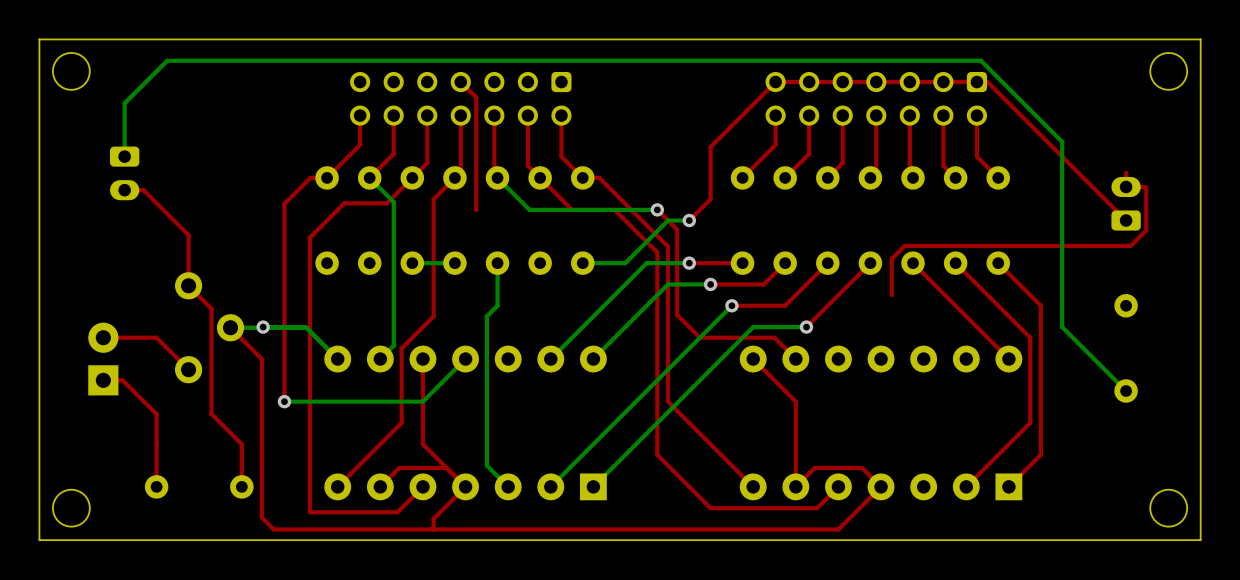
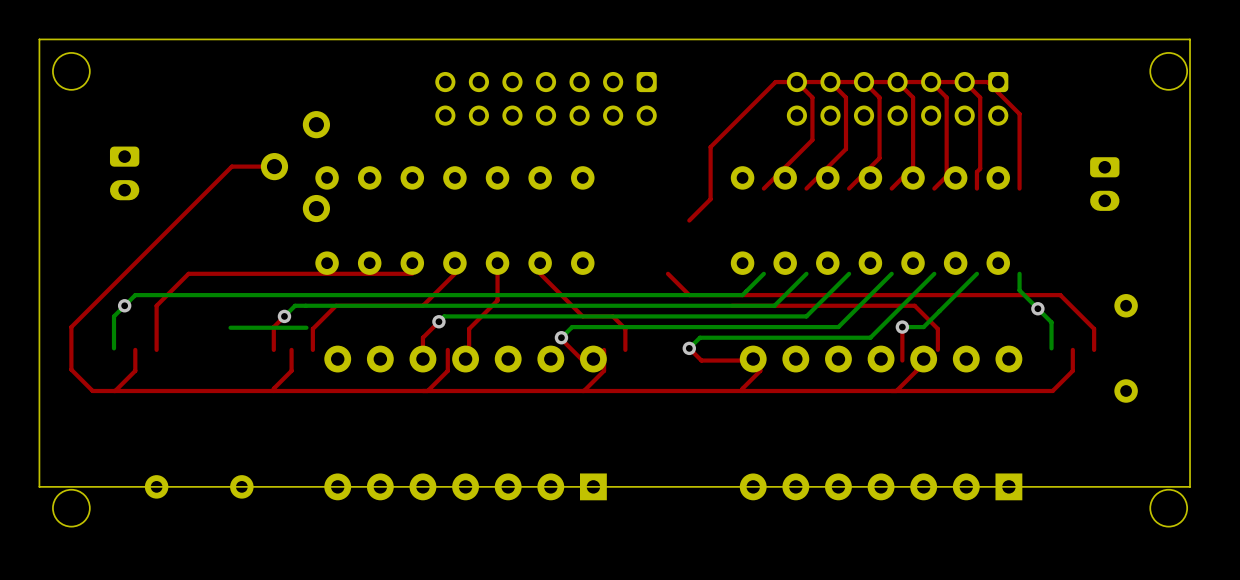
board edge: (1190, 39) (1200, 39) (1200, 540) (39, 540) (39, 486) -> (1190, 39) (1190, 486) (39, 486)
top track: (460, 82) (476, 97) (476, 209) -> none
top track: none -> (796, 82) (812, 97) (812, 140) (763, 188)
top track: none -> (830, 82) (846, 97) (846, 149) (806, 188)
top track: none -> (864, 82) (879, 97) (879, 158) (849, 188)
top track: none -> (897, 82) (913, 97) (913, 167) (891, 188)
top track: none -> (931, 82) (946, 97) (946, 176) (934, 188)
top track: none -> (964, 82) (980, 97) (980, 168) (976, 171) (976, 188)
part position: (460, 98) -> (546, 98)
part position: (876, 98) -> (897, 98)
top track: (1019, 114) (1126, 220) -> (1019, 114) (1019, 188)
top track: (360, 115) (360, 144) (327, 177) (310, 177) (284, 203) (284, 401) -> none
top track: (393, 115) (393, 153) (369, 177) -> none
top track: (427, 115) (427, 162) (386, 203) (344, 203) (309, 237) (309, 512) (397, 512) (422, 486) -> none
top track: (460, 115) (460, 172) (433, 199) (433, 316) (401, 348) (401, 422) (337, 486) -> none
top track: (494, 115) (494, 174) (497, 177) -> none
top track: (527, 115) (527, 165) (572, 209) (614, 209) (657, 252) (657, 454) (710, 508) (817, 508) (838, 486) -> none
top track: (561, 115) (561, 156) (582, 177) (599, 177) (667, 246) (667, 401) (753, 486) -> none
top track: (775, 115) (775, 144) (742, 177) -> none
top track: (809, 115) (809, 153) (785, 177) -> none
top track: (842, 115) (842, 162) (827, 177) -> none
top track: (876, 115) (876, 172) (870, 177) -> none
top track: (909, 115) (909, 174) (913, 177) -> none
top track: (943, 115) (943, 165) (955, 177) -> none
top track: (976, 115) (976, 156) (998, 177) -> none
bottom track: (124, 156) (124, 103) (167, 60) (981, 60) (1062, 141) (1062, 327) (1126, 391) -> none
top track: none -> (274, 166) (231, 166) (71, 327) (71, 369) (92, 391) (1052, 391) (1072, 370) (1072, 349)
top track: (1126, 172) (1126, 186) (1146, 188) (1146, 230) (1130, 245) (904, 245) (891, 259) (891, 295) -> none
bottom track: (369, 177) (393, 202) (393, 345) (380, 359) -> none
bottom track: (497, 177) (529, 209) (657, 209) -> none
top track: (124, 190) (143, 190) (188, 235) (188, 285) (211, 308) (211, 413) (241, 444) (241, 486) -> none
part rotation: 0° (1126, 203) -> 180° (1104, 184)
top track: (657, 209) (677, 229) (677, 314) (699, 337) (774, 337) (795, 359) -> none
via: (657, 209) -> none
bottom track: (689, 220) (667, 220) (625, 263) (582, 263) -> none
via: (689, 220) -> none
bottom track: (454, 263) (412, 263) -> none
bottom track: (497, 263) (497, 305) (486, 316) (486, 465) (508, 486) -> none
bottom track: (689, 263) (646, 263) (550, 359) -> none
via: (689, 263) -> none
top track: (742, 263) (689, 263) -> none
top track: (785, 263) (763, 284) (710, 284) -> none
top track: (827, 263) (785, 305) -> (937, 349) (937, 328) (914, 305) (785, 305)
top track: (870, 263) (806, 327) -> none
top track: (913, 263) (1008, 359) -> none
top track: (955, 263) (1030, 337) (1030, 422) (966, 486) -> none
top track: (998, 263) (1040, 305) (1040, 454) (1008, 486) -> none
top track: none -> (412, 273) (188, 273) (156, 305) (156, 349)
top track: none -> (454, 273) (422, 305) (336, 305) (312, 328) (312, 349)
top track: none -> (497, 273) (497, 300) (469, 328) (469, 349)
top track: none -> (540, 273) (582, 316) (612, 316) (625, 328) (625, 349)
top track: none -> (667, 273) (689, 295) (1060, 295) (1094, 328) (1094, 349)
bottom track: none -> (763, 273) (742, 295) (135, 295) (114, 316) (114, 348)
bottom track: none -> (806, 273) (774, 305) (295, 305) (284, 316)
bottom track: none -> (849, 273) (806, 316) (444, 316) (438, 321)
bottom track: none -> (891, 273) (838, 327) (806, 327)
bottom track: none -> (976, 273) (923, 327) (902, 327)
bottom track: none -> (1019, 273) (1019, 290) (1051, 322) (1051, 348)
bottom track: (710, 284) (667, 284) (593, 359) -> none
via: (710, 284) -> none
via: none -> (124, 305)
bottom track: (731, 305) (699, 337) -> (934, 273) (870, 337) (699, 337)
via: (731, 305) -> none
via: none -> (1037, 308)
top track: none -> (284, 316) (273, 327) (273, 349)
top track: none -> (438, 321) (422, 337) (422, 349)
via: none -> (438, 321)
part rotation: 0° (209, 327) -> 180° (295, 166)
part position: (209, 327) -> (295, 166)
top track: (263, 327) (230, 327) (261, 359) (261, 517) (273, 529) (838, 529) (881, 486) (862, 468) (814, 468) (795, 486) (795, 401) (753, 359) -> none
bottom track: (263, 327) (305, 327) (337, 359) -> none
via position: (263, 327) -> (284, 316)
bottom track: (753, 327) (593, 486) -> (753, 327) (572, 327) (561, 337)
via: (806, 327) -> none
top track: none -> (902, 327) (902, 360)
via: none -> (902, 327)
top track: (103, 337) (156, 337) (188, 369) -> none
top track: none -> (561, 337) (582, 360)
via: none -> (561, 337)
top track: none -> (689, 348) (701, 360) (742, 360)
bottom track: (689, 348) (550, 486) -> none
via: none -> (689, 348)
top track: none -> (135, 349) (135, 370) (115, 391)
top track: none -> (291, 349) (291, 370) (273, 388) (273, 391)
top track: none -> (447, 349) (447, 370) (427, 391)
top track: none -> (604, 349) (604, 370) (583, 391)
top track: none -> (760, 349) (760, 370) (742, 388) (742, 391)
top track: none -> (916, 349) (916, 370) (896, 391)
part: (103, 359) -> none
top track: (422, 359) (422, 444) (465, 486) (433, 518) (433, 529) -> none
bottom track: (465, 359) (422, 401) (284, 401) -> none
top track: (103, 380) (122, 380) (156, 414) (156, 486) -> none
via: (284, 401) -> none
top track: (446, 468) (399, 468) (380, 486) -> none

